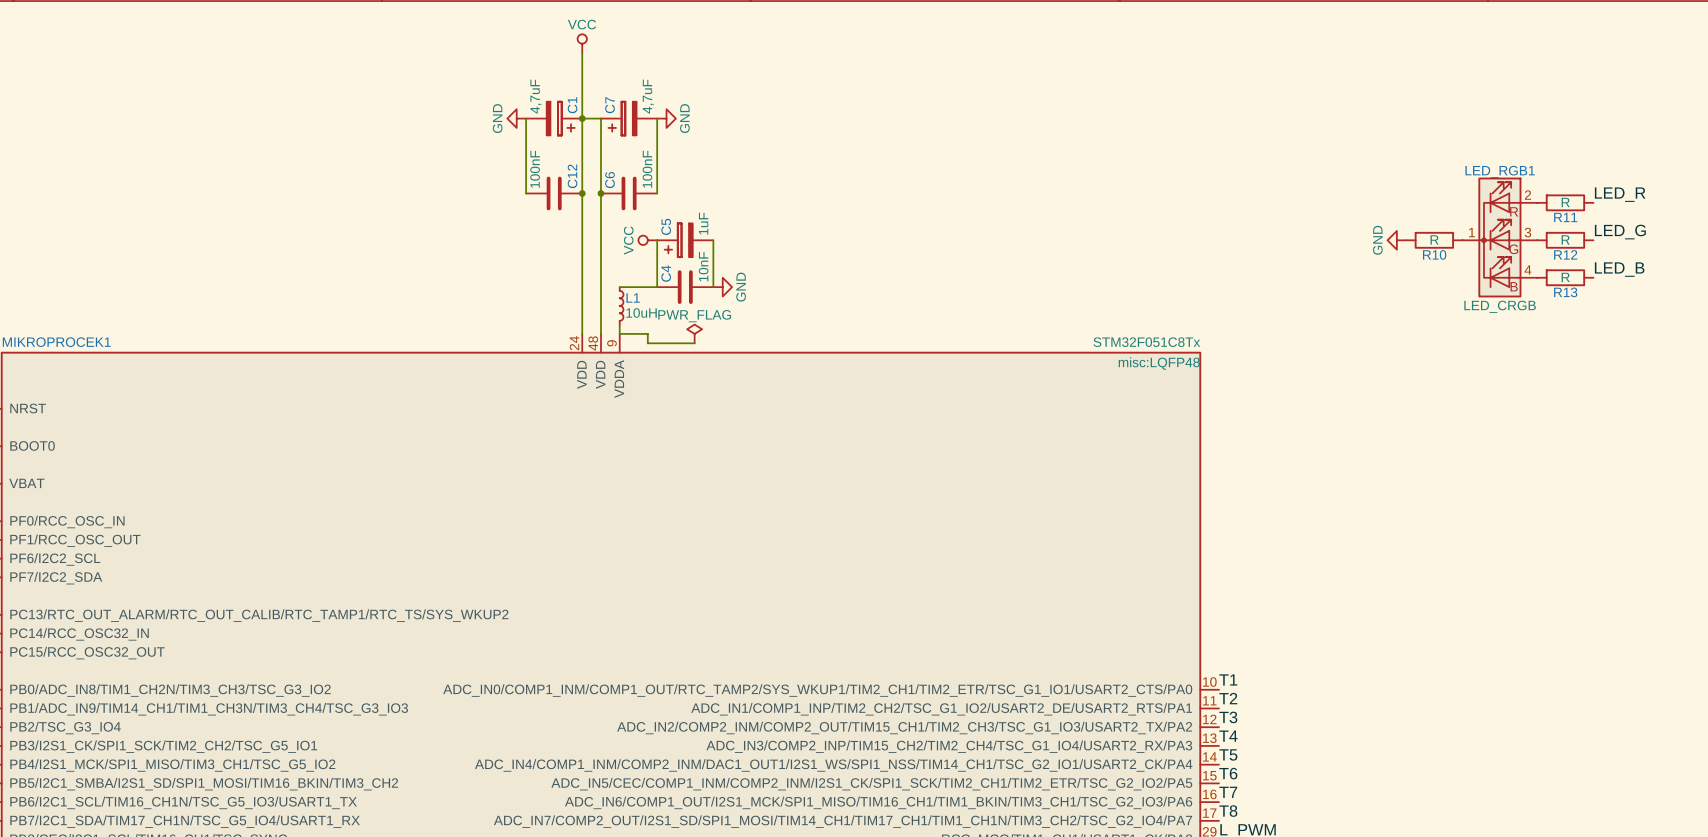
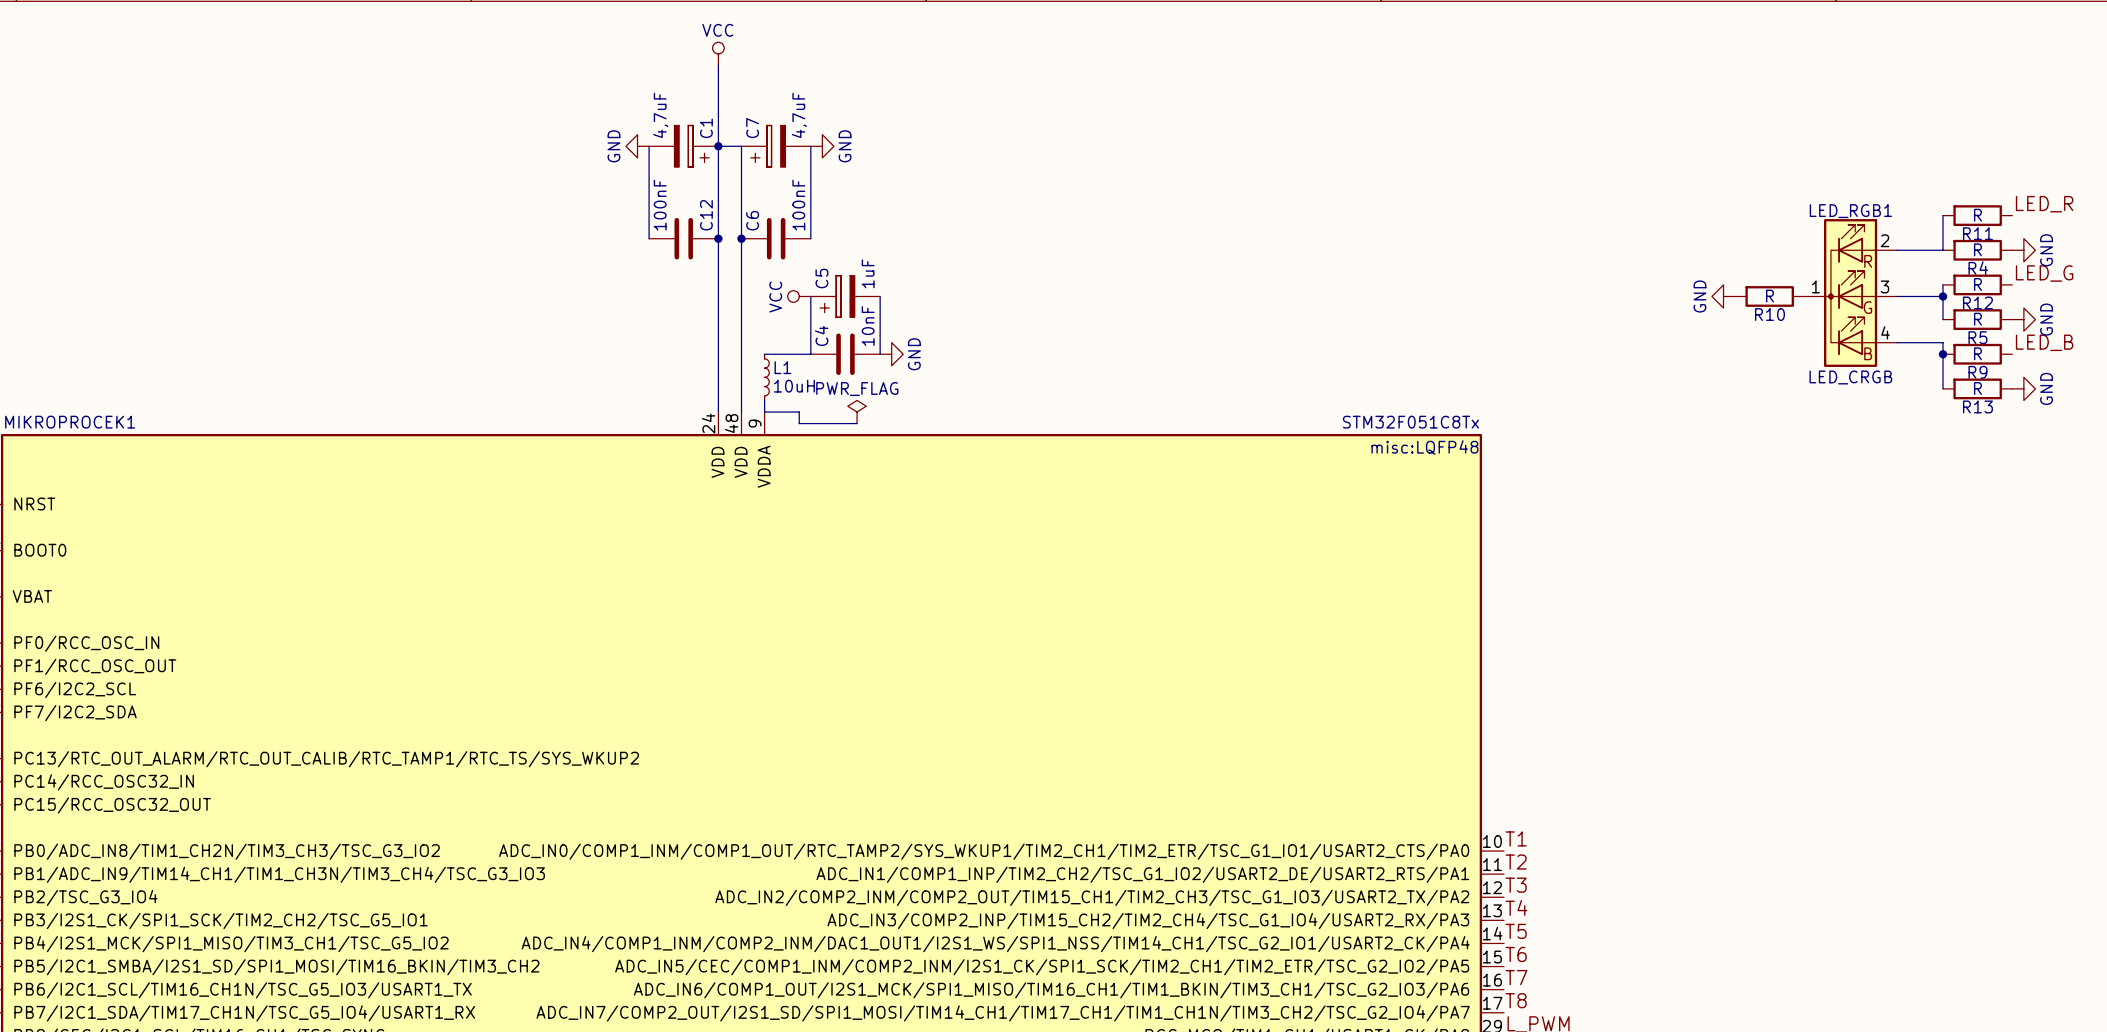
wire: none -> (1943, 215) (1943, 250) (1896, 250)
label position: LED_R (1620, 194) -> LED_R (2044, 204)
R11 position: (1565, 202) -> (1977, 215)
R4: none -> R (1977, 250)
power symbol: none -> GND (2023, 250)
wire: none -> (1943, 284) (1943, 319)
label position: LED_G (1620, 232) -> LED_G (2044, 273)
wire: none -> (1896, 296) (1943, 296)
R12 position: (1565, 240) -> (1977, 284)
junction: none -> (1943, 296)
R5: none -> R (1977, 319)
power symbol: none -> GND (2023, 319)
label position: LED_B (1619, 269) -> LED_B (2044, 342)
wire: none -> (1896, 342) (1943, 342) (1943, 388)
R13 position: (1565, 277) -> (1977, 388)
junction: none -> (1943, 354)
R9: none -> R (1977, 354)
power symbol: none -> GND (2023, 388)

